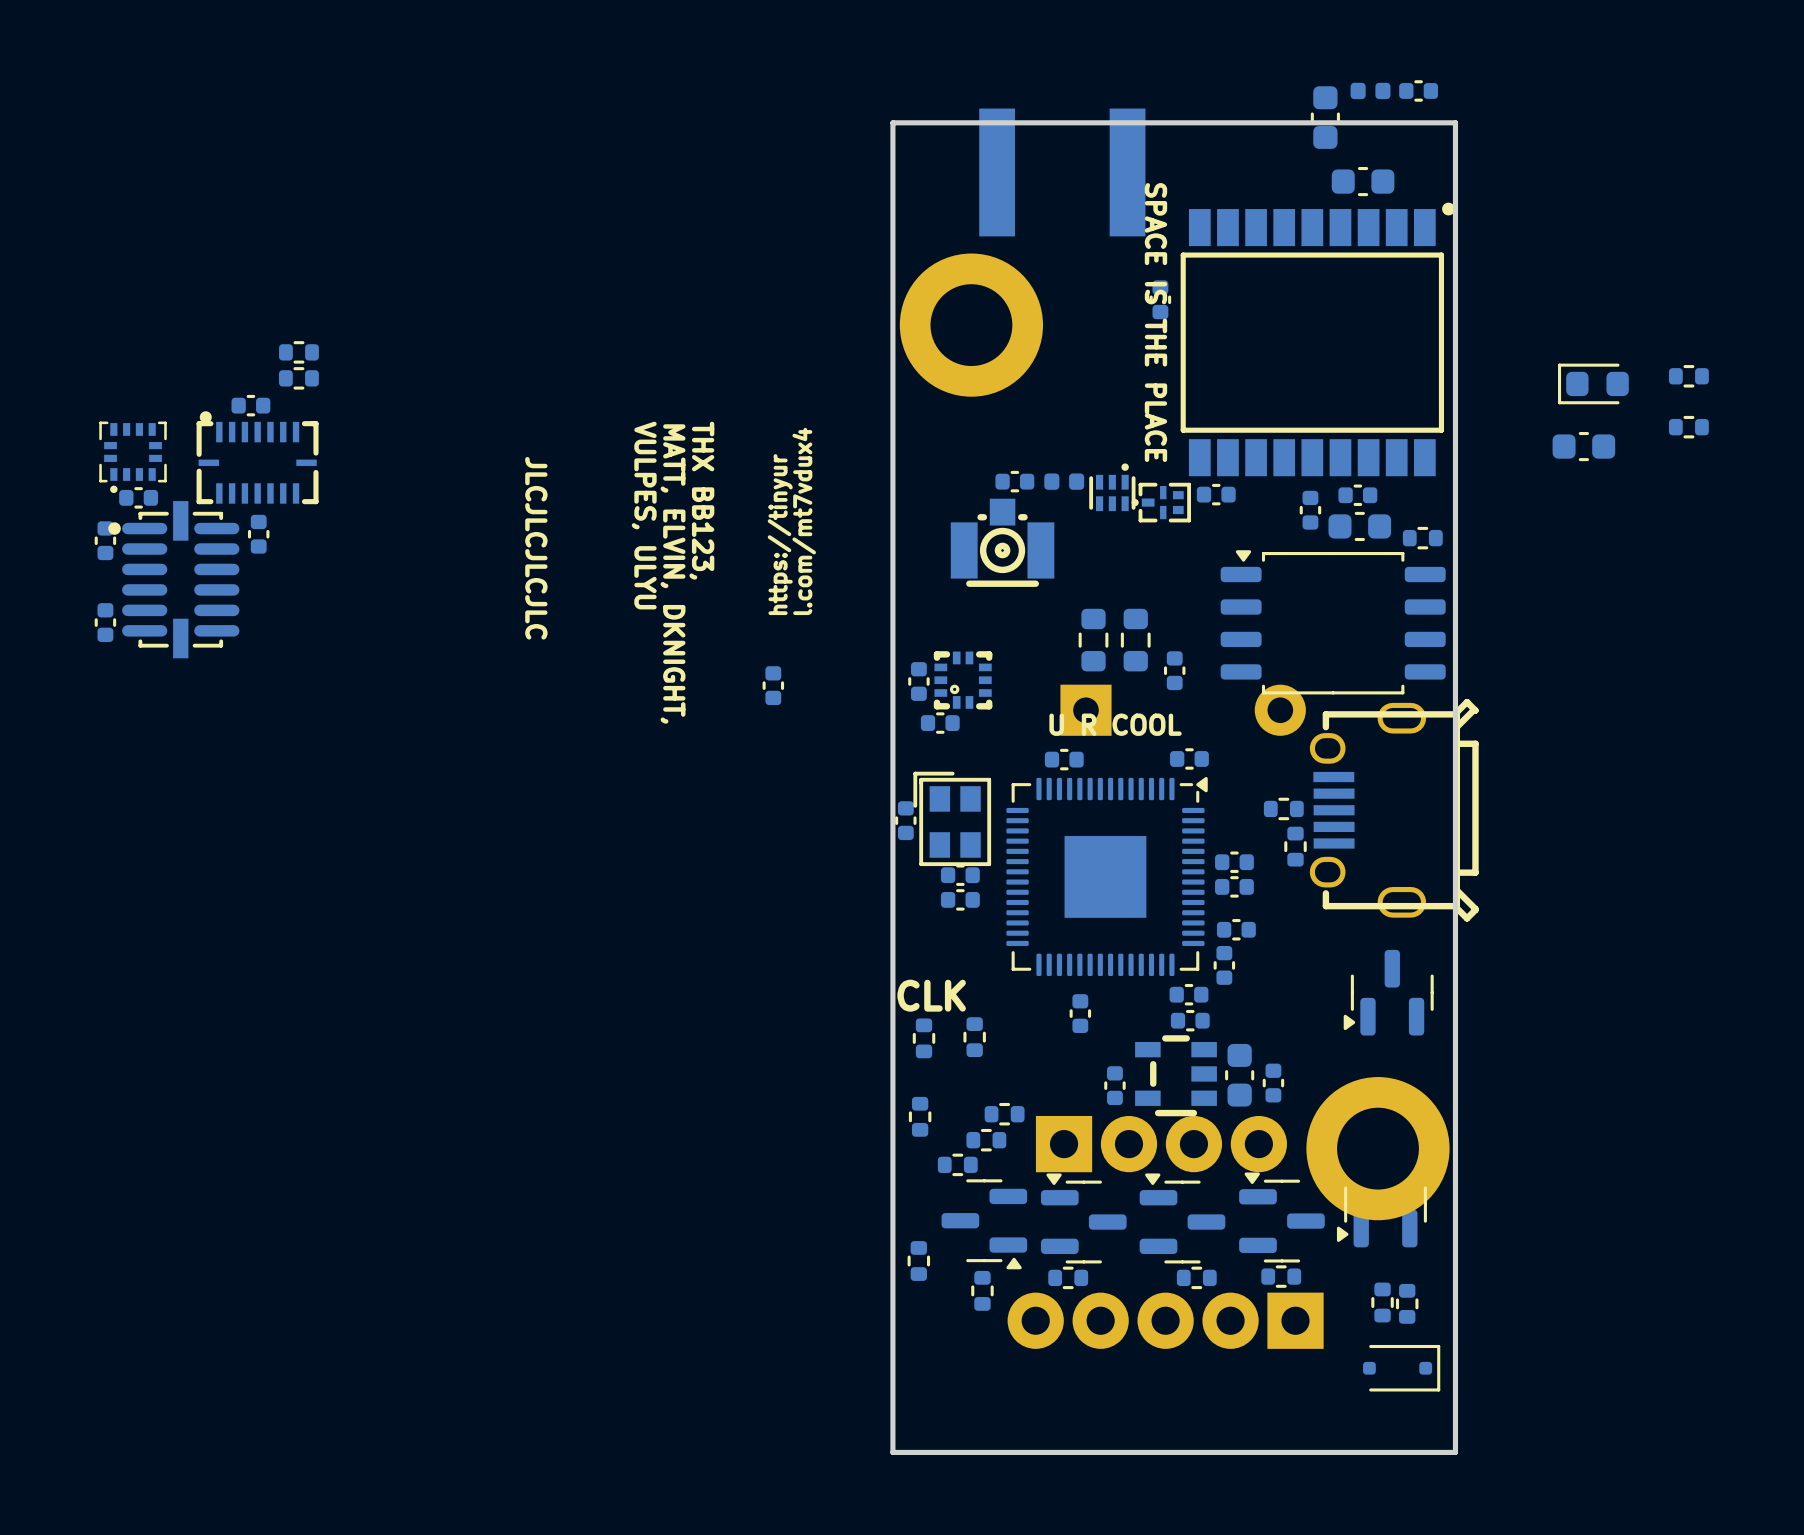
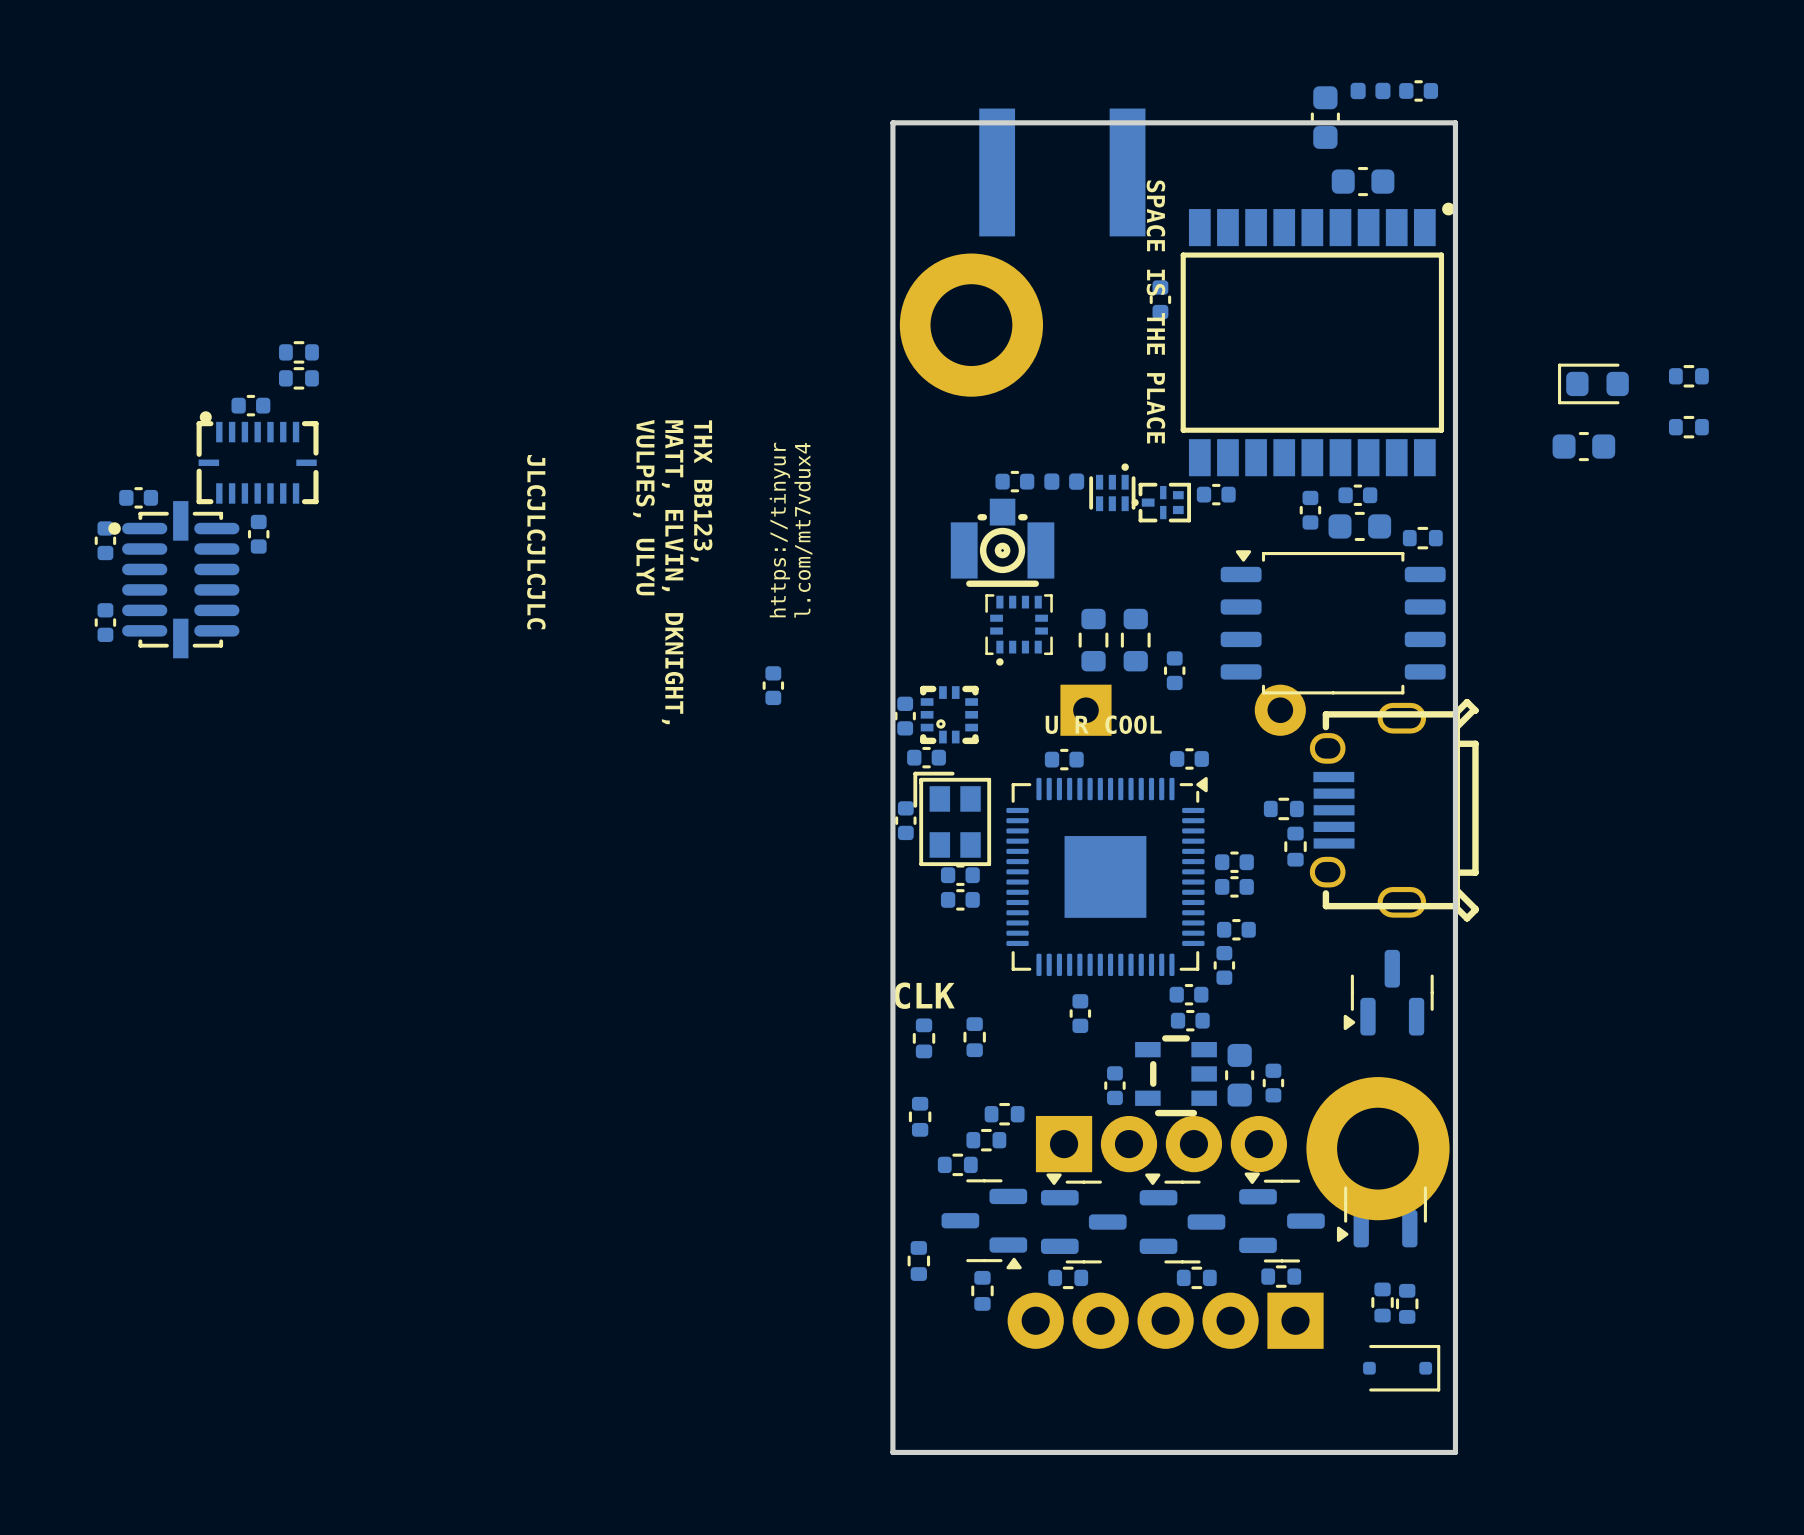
part: (133, 457) -> none
part: none -> (1019, 629)
part: (963, 680) -> none
part position: (918, 681) -> (905, 716)
part footprint: [920, 712, 960, 734] -> [920, 685, 979, 745]
part: none -> (926, 757)

